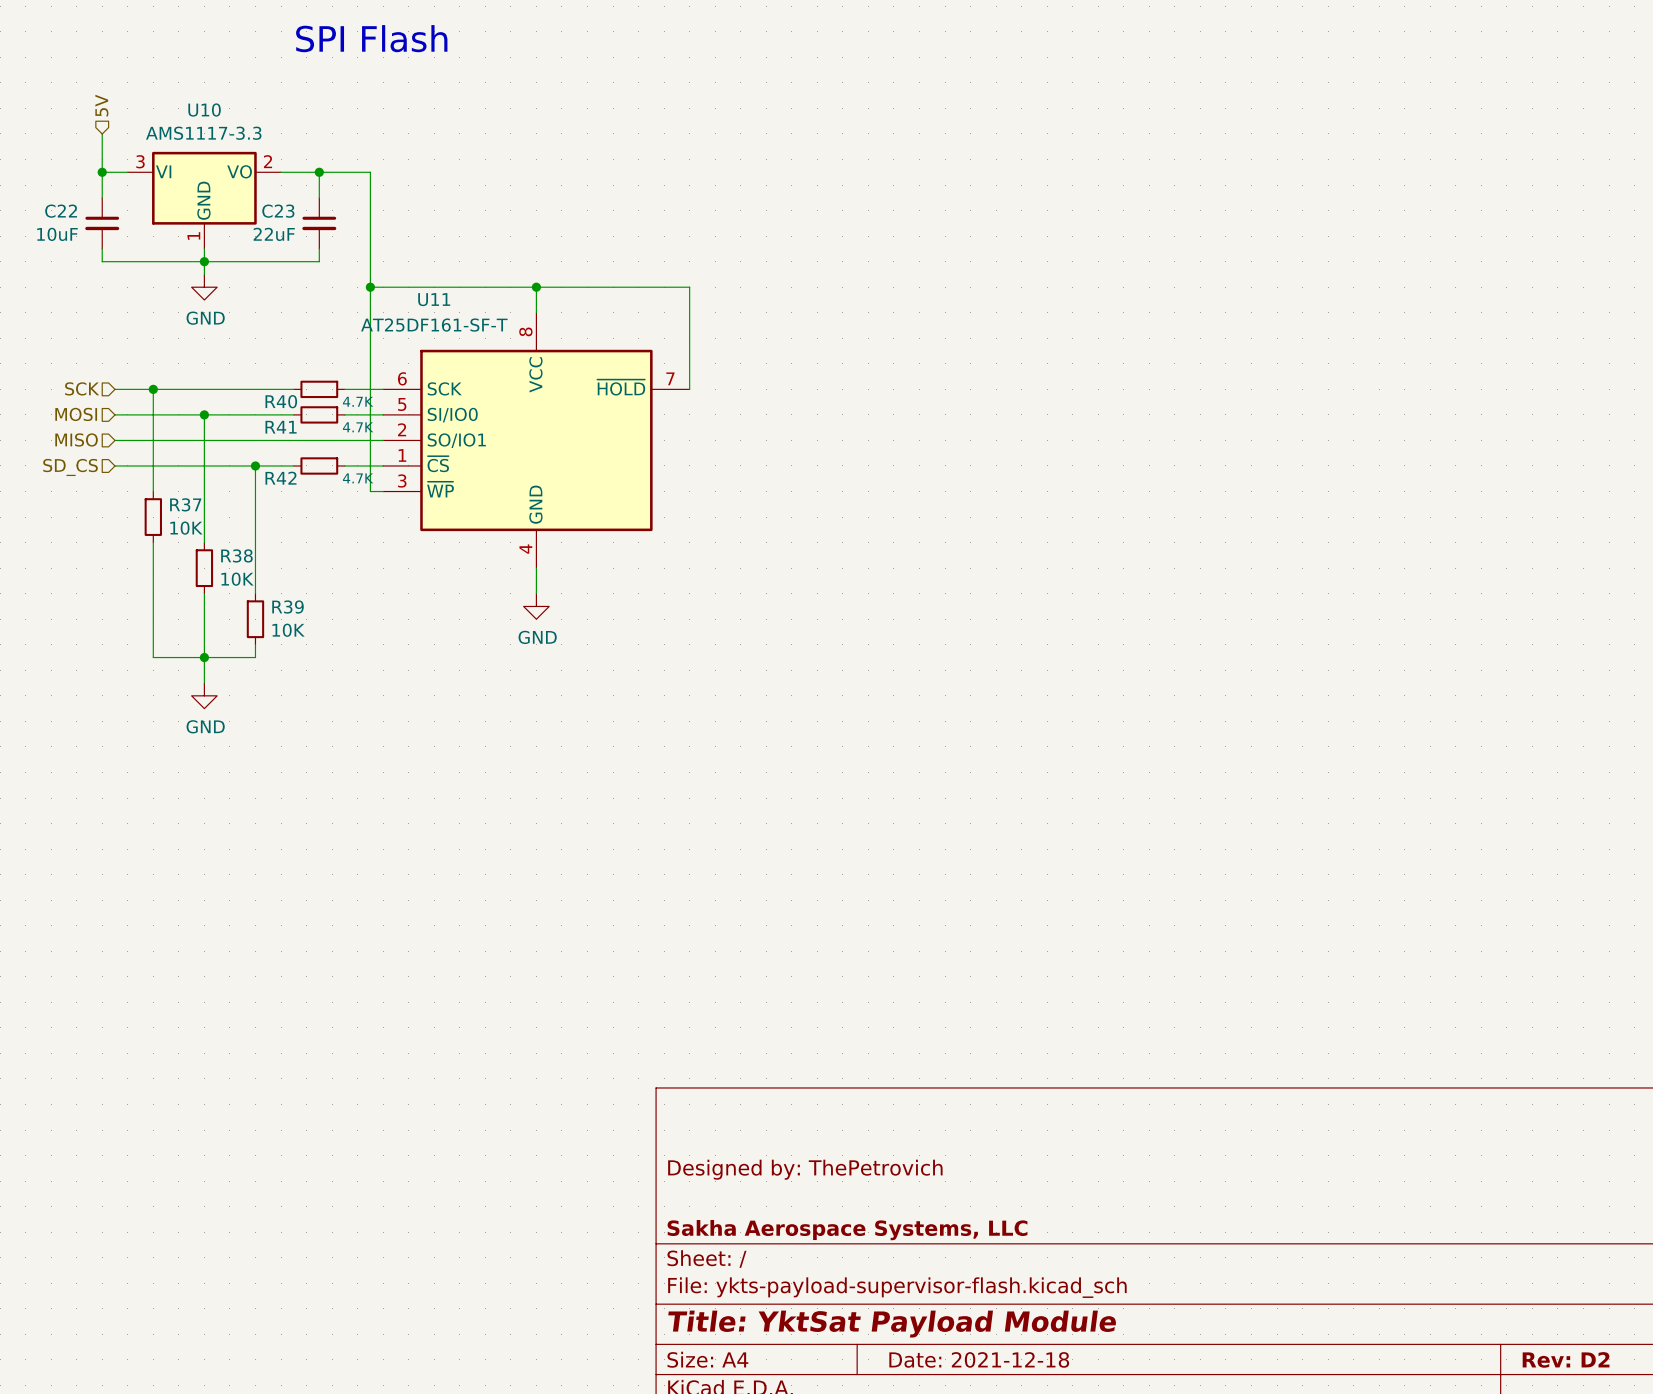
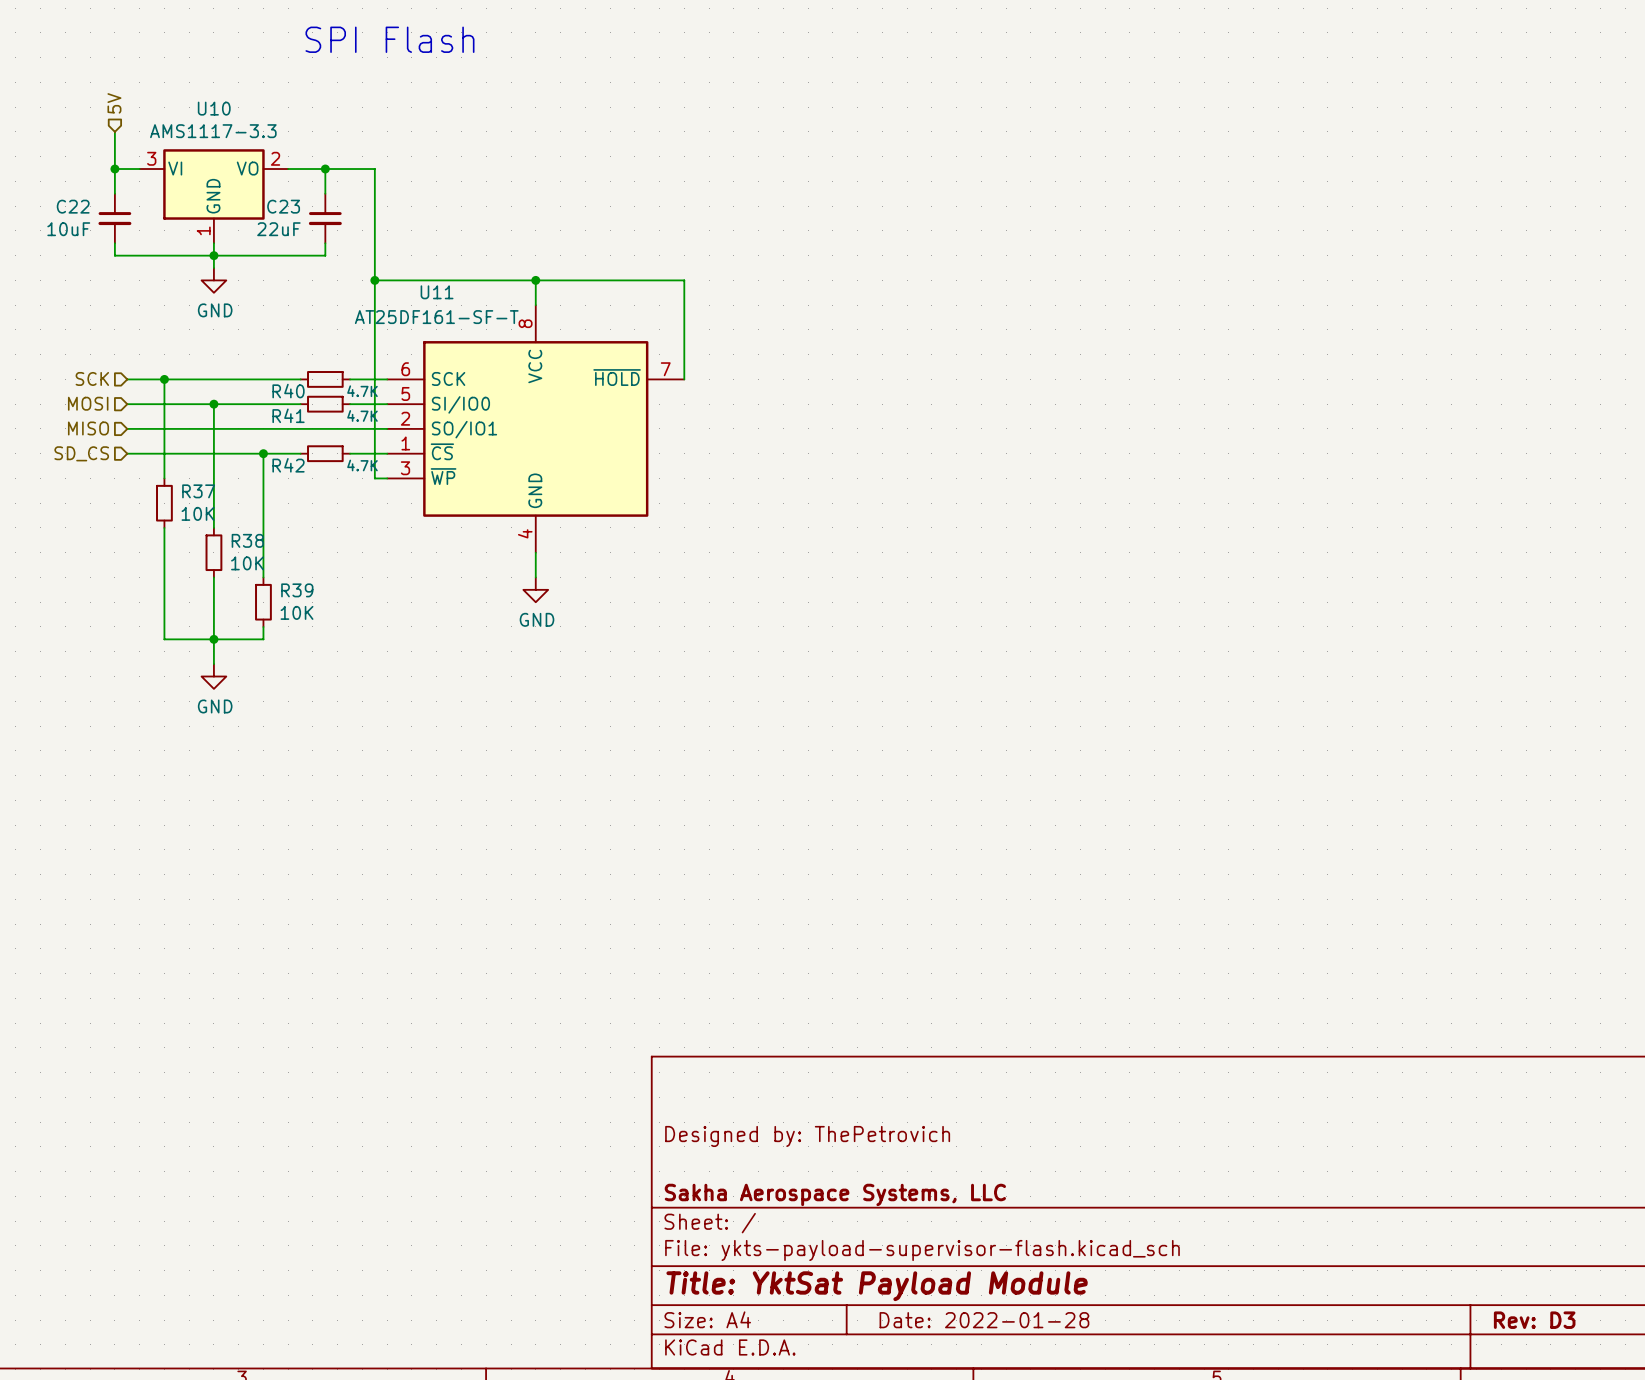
title block: Date: 2021-12-18 (979, 1359) -> Date: 2022-01-28 (984, 1320)
title block: Rev: D2 (1566, 1359) -> Rev: D3 (1534, 1320)

